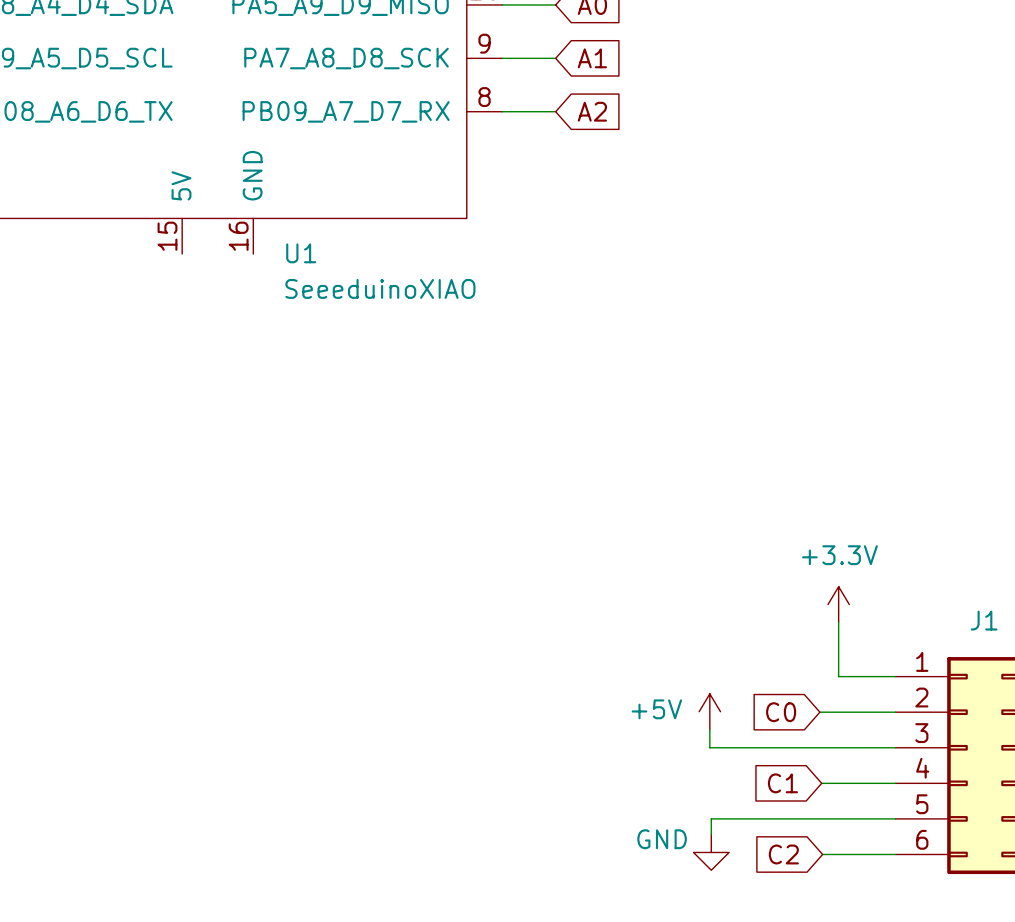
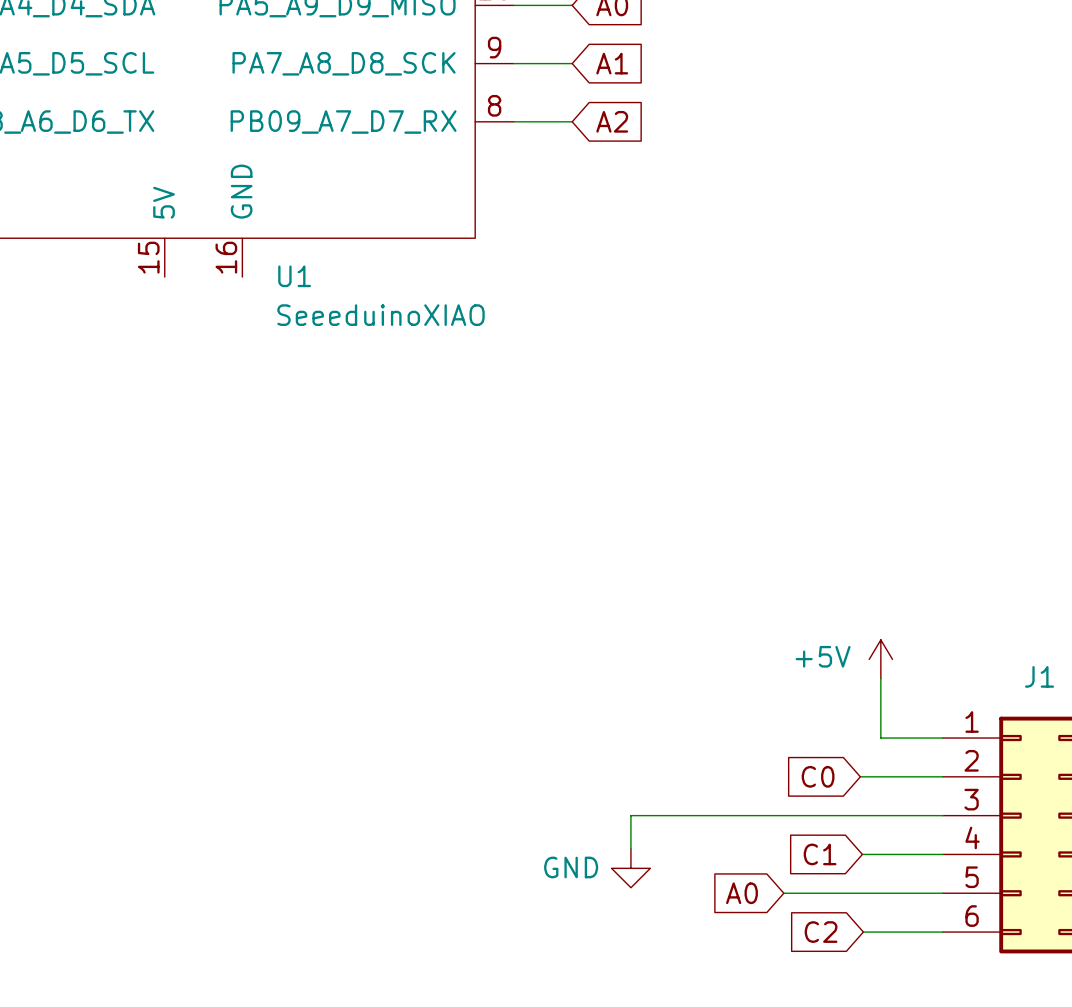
power symbol: +3.3V (838, 604) -> +5V (880, 659)
power symbol: +5V (709, 711) -> none
wire: (709, 729) (709, 747) -> (630, 848) (630, 815) (740, 815)
global label: none -> A0 (741, 893)
wire: (749, 818) (711, 818) (711, 834) -> none
power symbol text position: GND (662, 839) -> GND (571, 867)
power symbol position: GND (711, 852) -> GND (630, 868)

